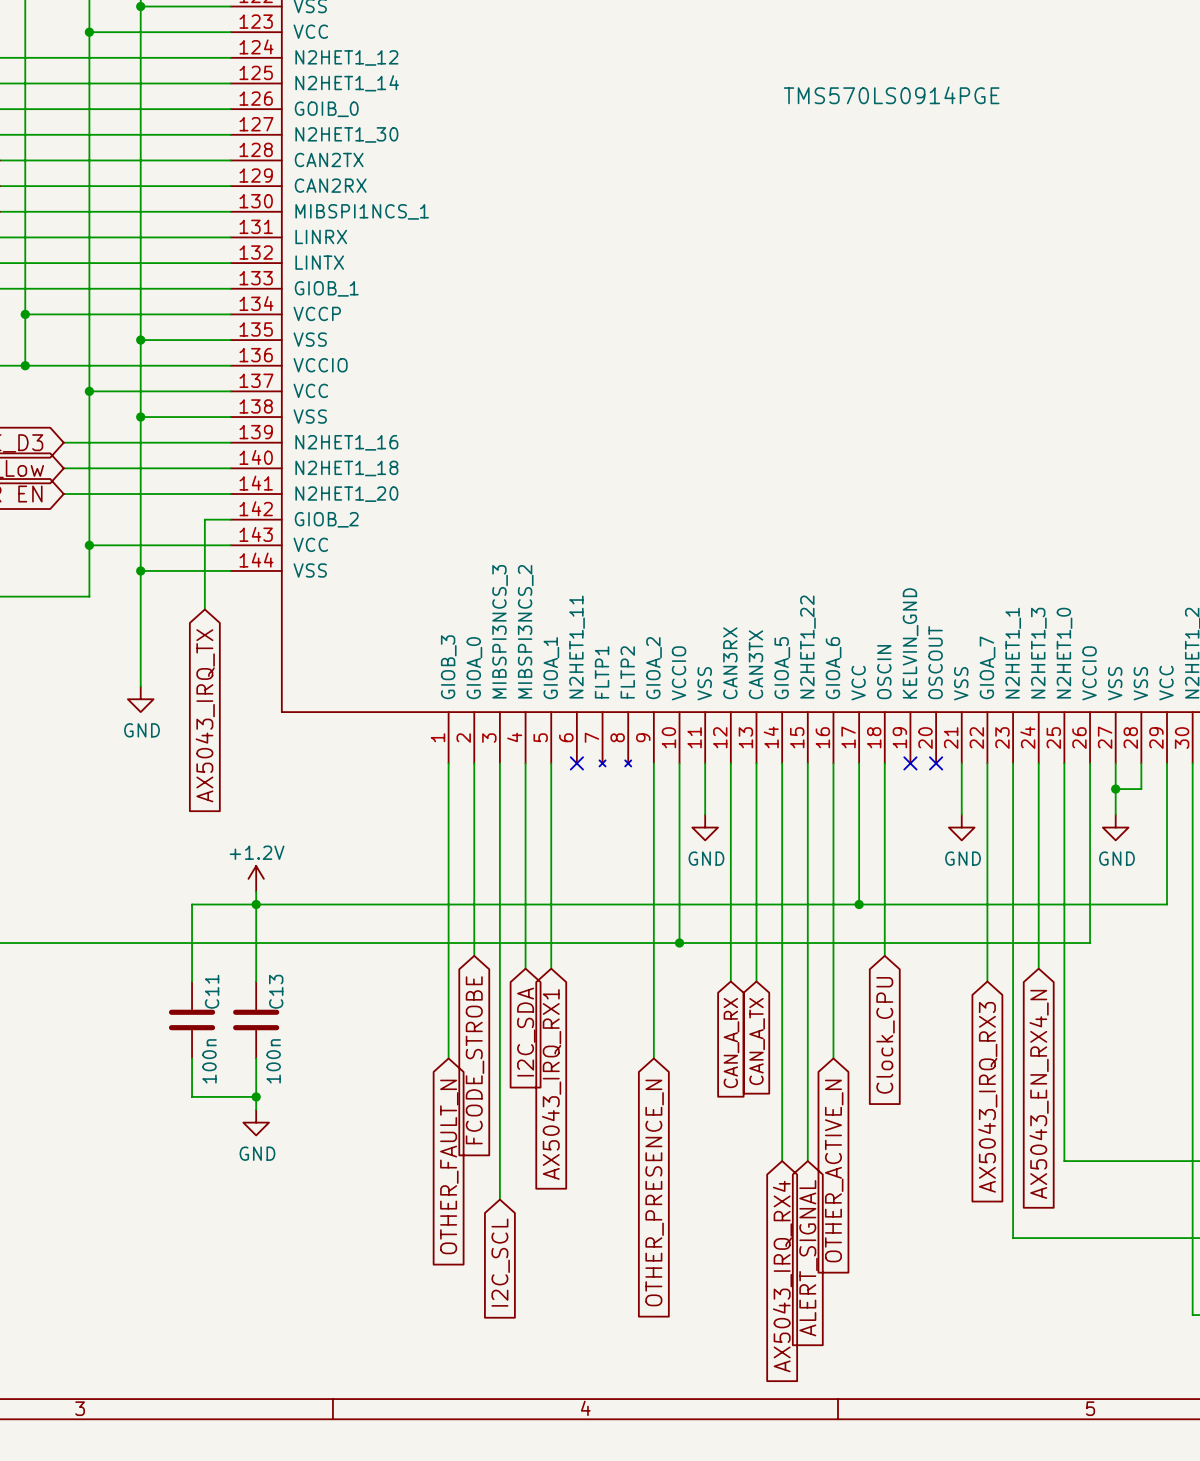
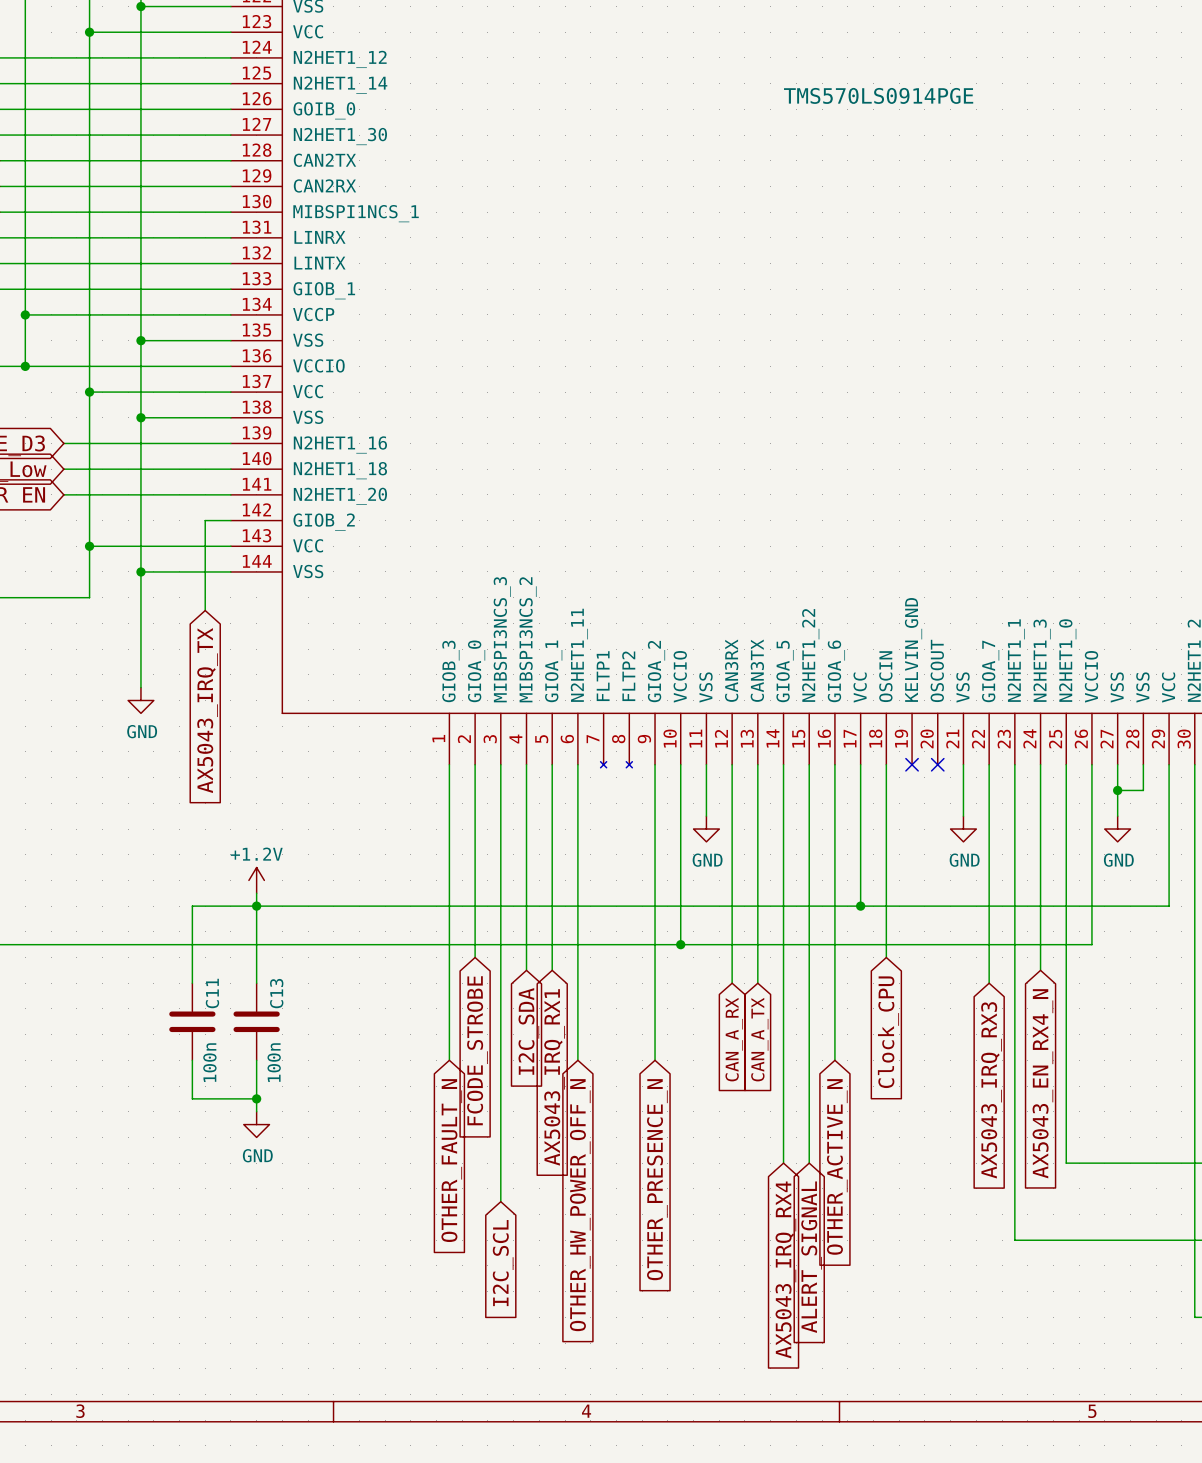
wire: none -> (577, 764) (577, 1060)
no-connect mark: (576, 763) -> none
global label: none -> OTHER_HW_POWER_OFF_N (580, 1205)

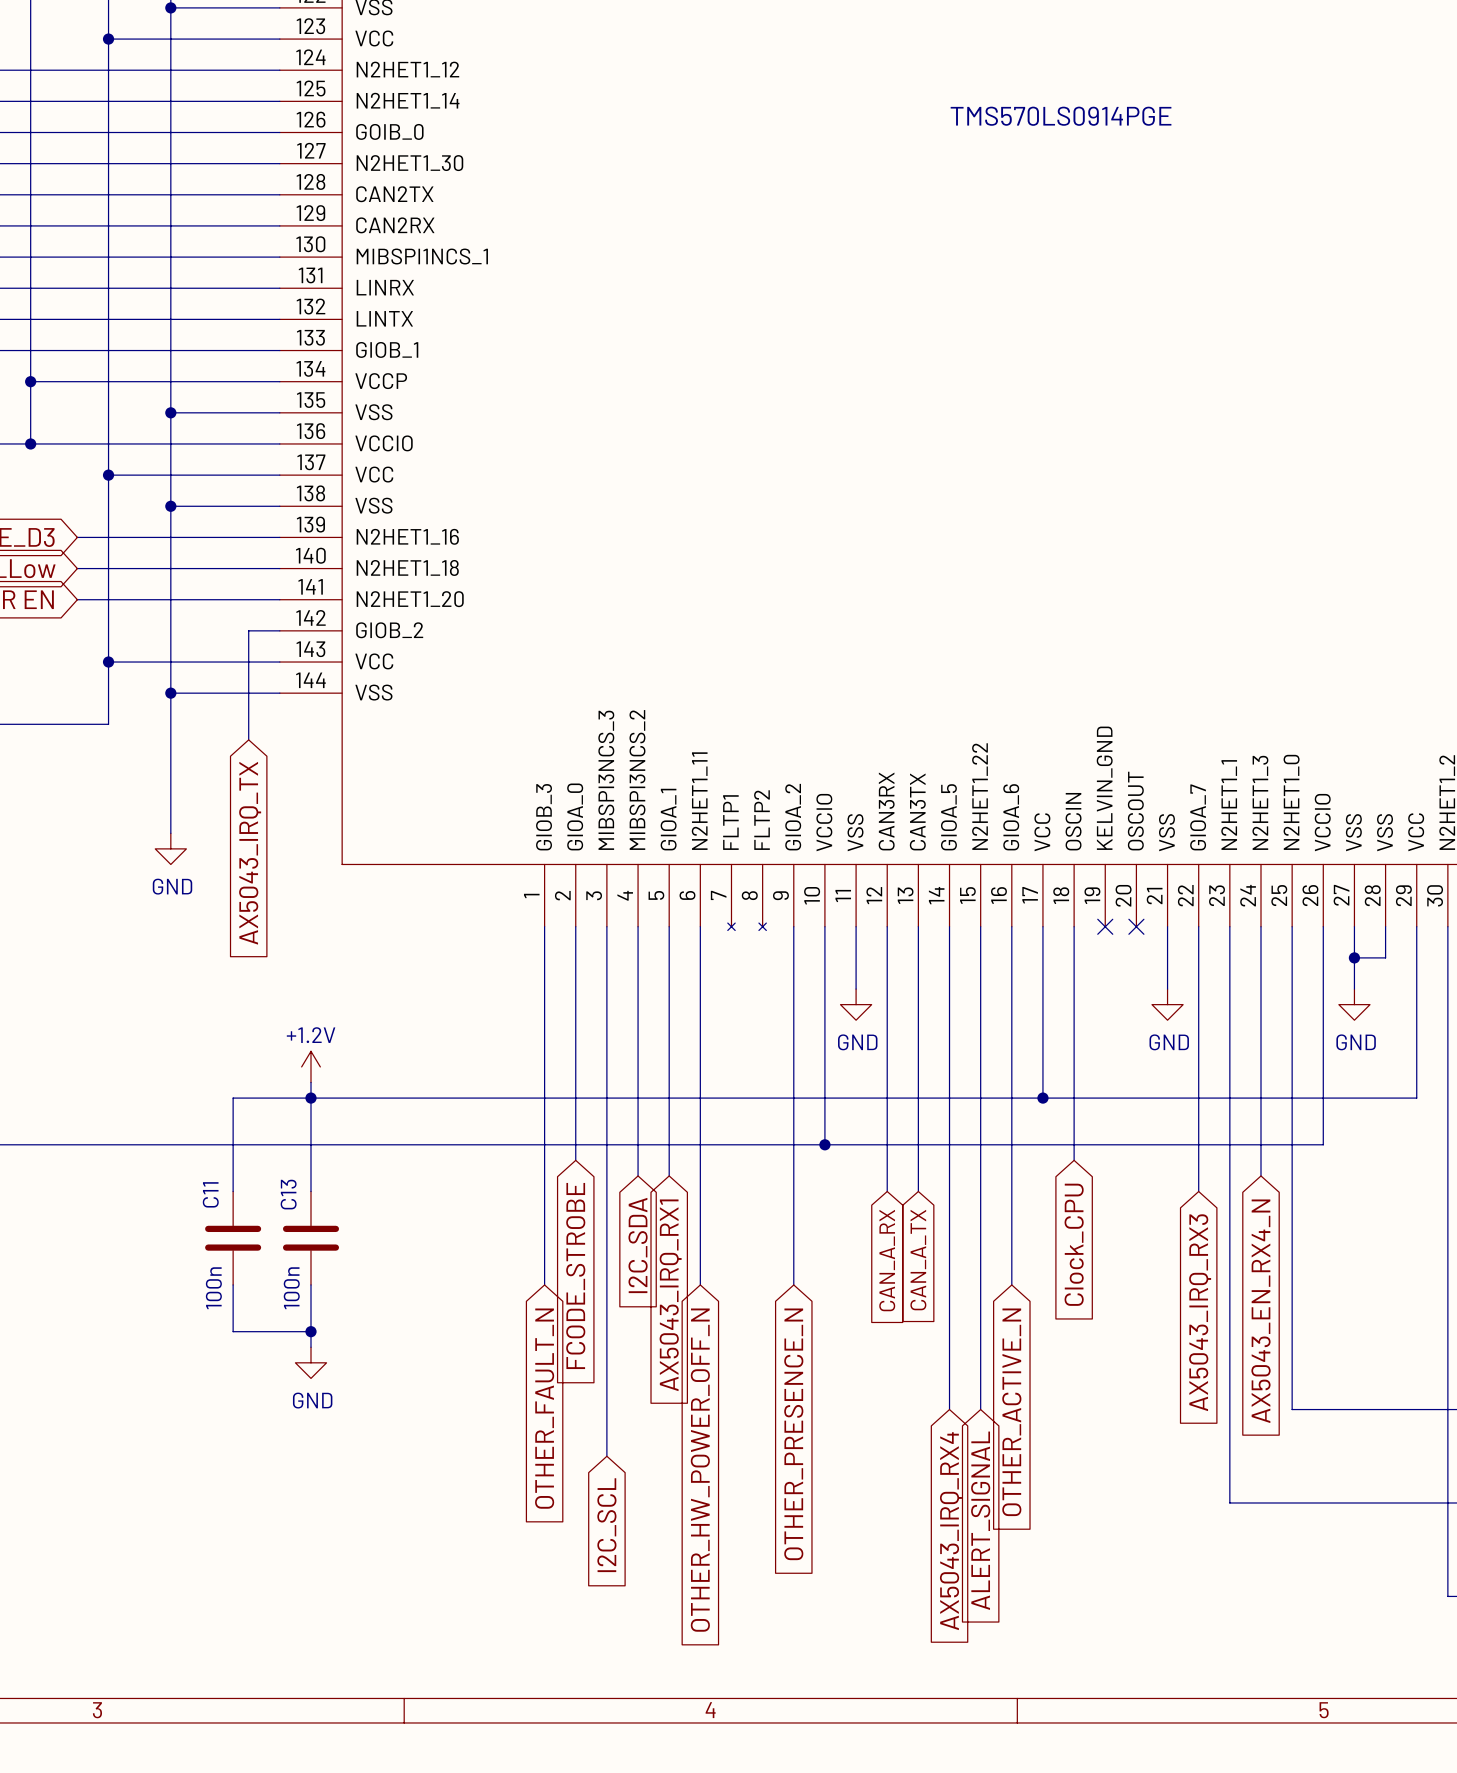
C11 name position: C11 (212, 993) -> C11 (210, 1194)
C13 name position: C13 (276, 993) -> C13 (288, 1194)
C11 value position: 100n (209, 1062) -> 100n (213, 1288)
C13 value position: 100n (274, 1062) -> 100n (291, 1288)

